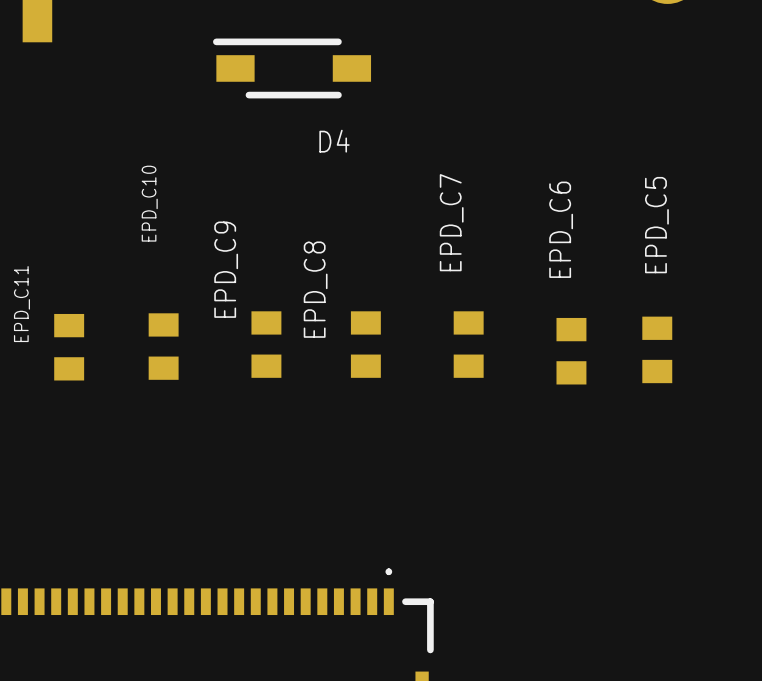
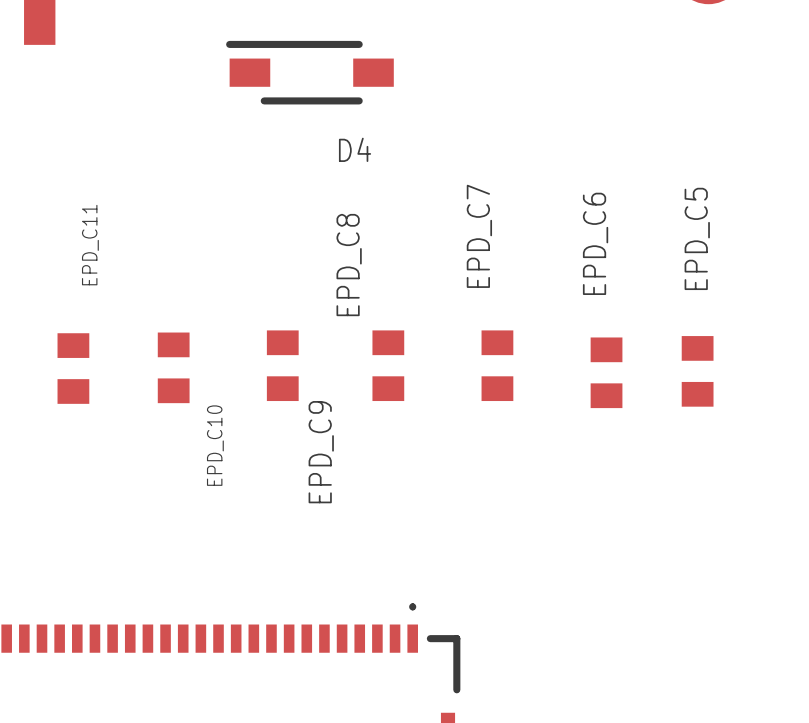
EPD_C10 name position: EPD_C10 (149, 203) -> EPD_C10 (215, 445)
EPD_C9 name position: EPD_C9 (226, 269) -> EPD_C9 (321, 452)
EPD_C8 name position: EPD_C8 (315, 289) -> EPD_C8 (349, 265)
EPD_C11 name position: EPD_C11 (21, 304) -> EPD_C11 (90, 245)

